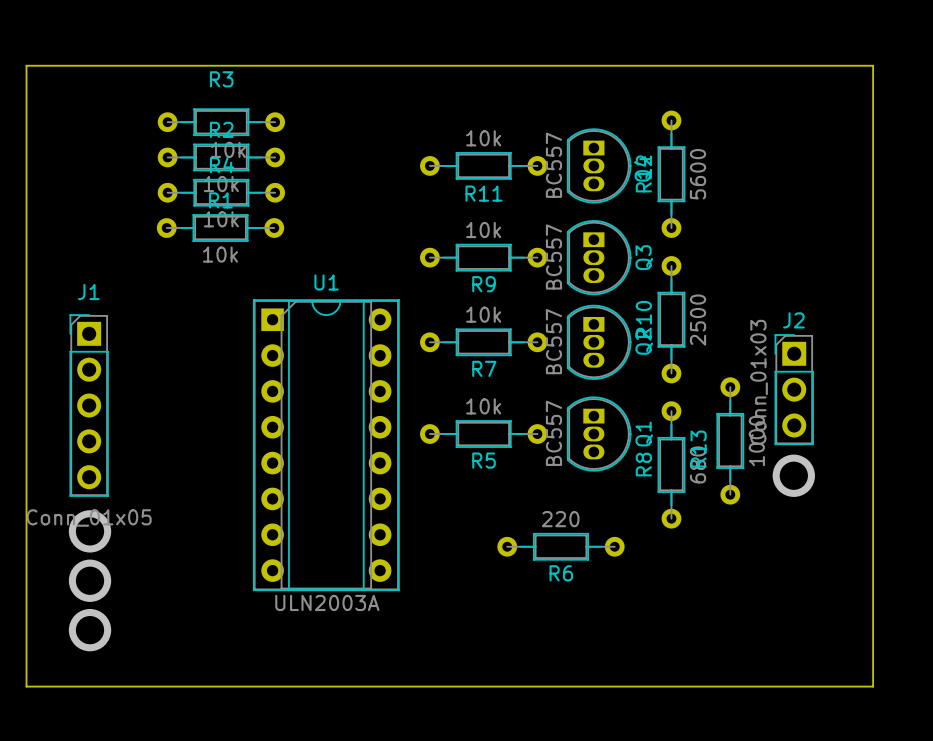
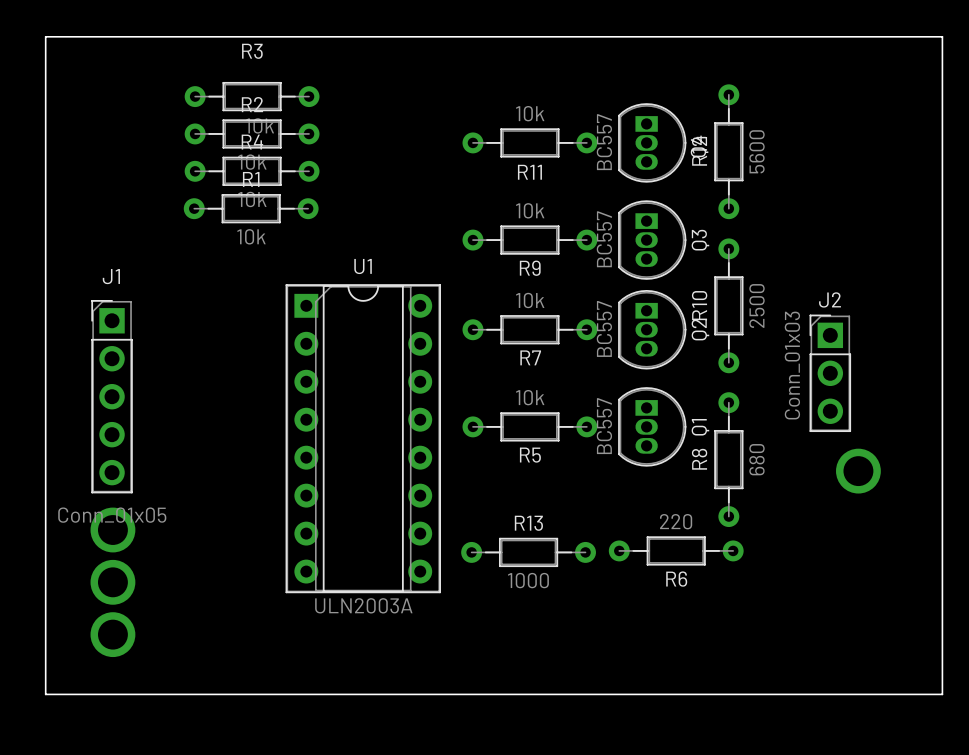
J2 position: (794, 389) -> (830, 373)
R13 rotation: 0° (730, 440) -> 90° clockwise (528, 552)
R13 position: (730, 440) -> (528, 552)
R6 position: (561, 546) -> (676, 550)

